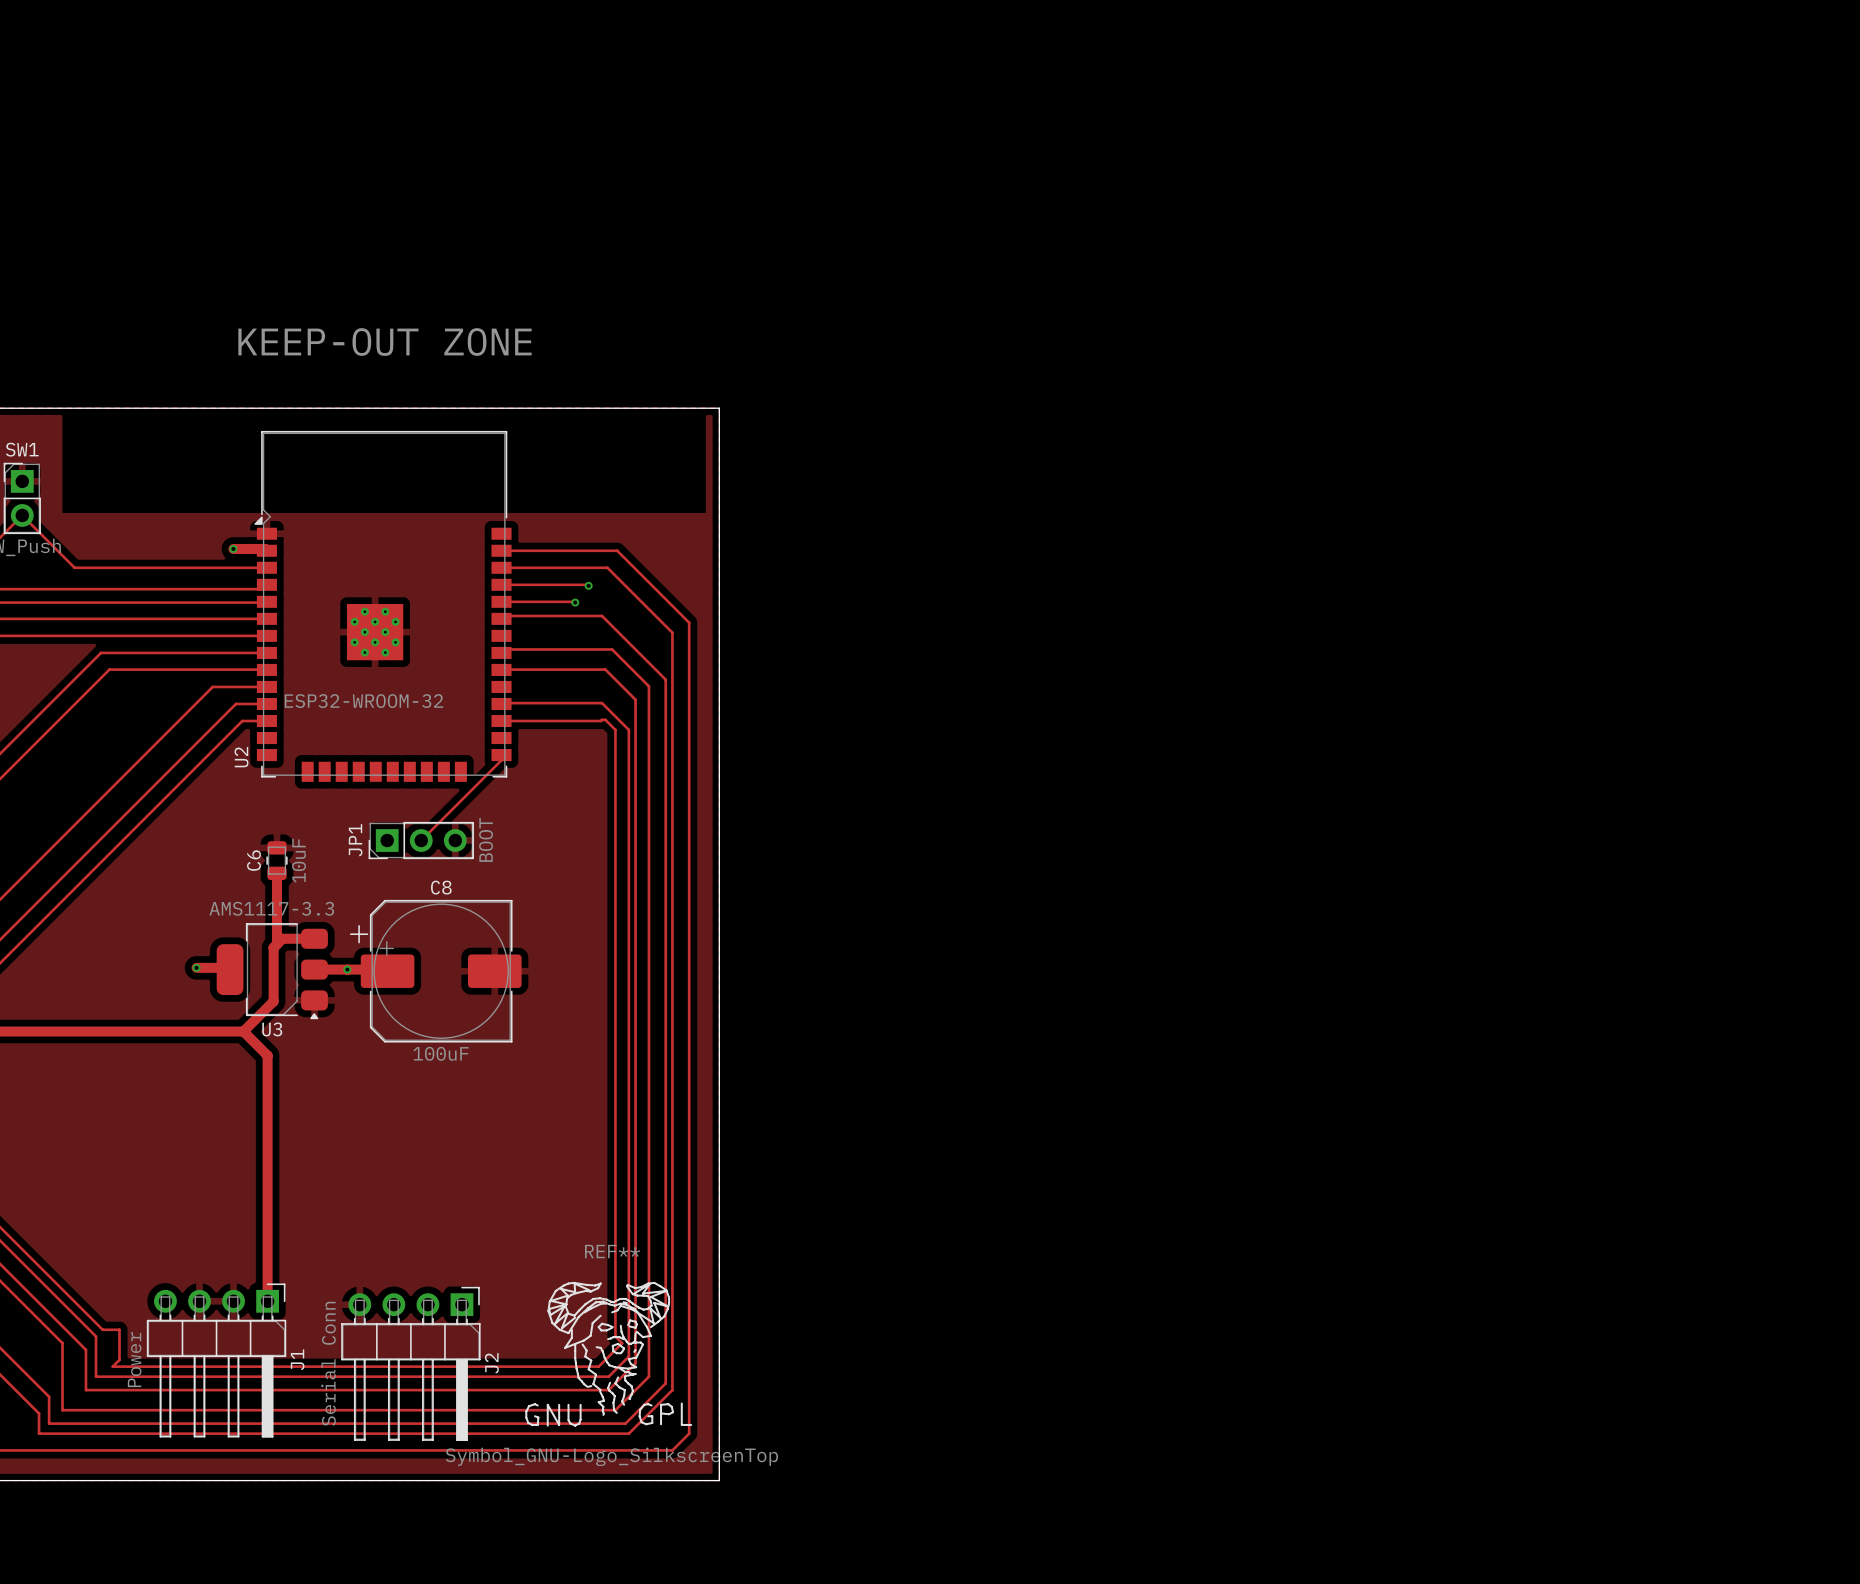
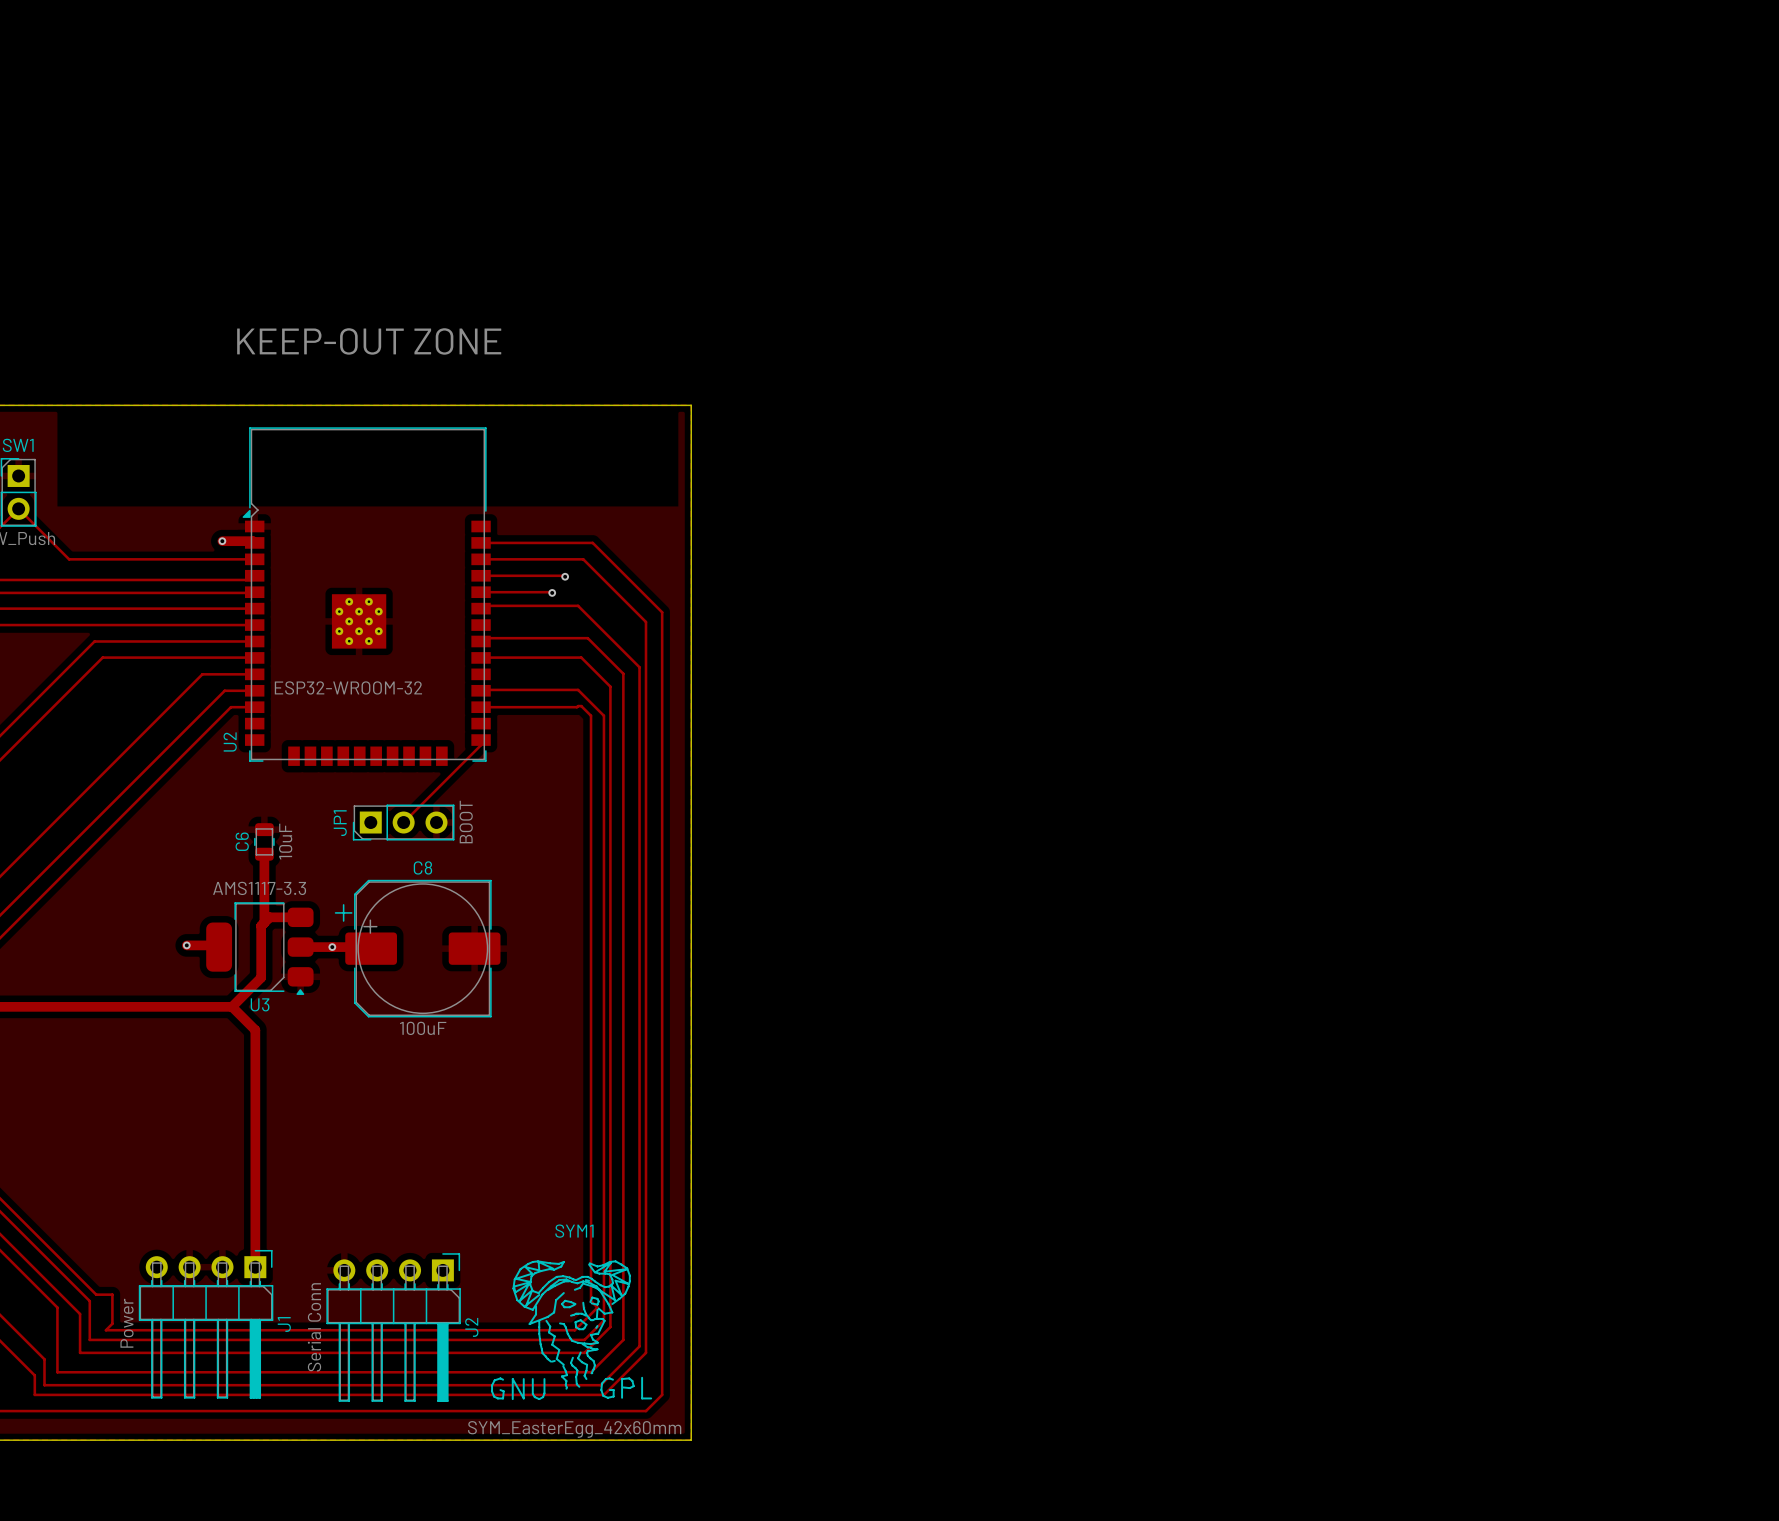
REF**: Symbol_GNU-Logo_SilkscreenTop (608, 1354) -> none
SYM1: none -> SYM_EasterEgg_42x60mm (571, 1330)

